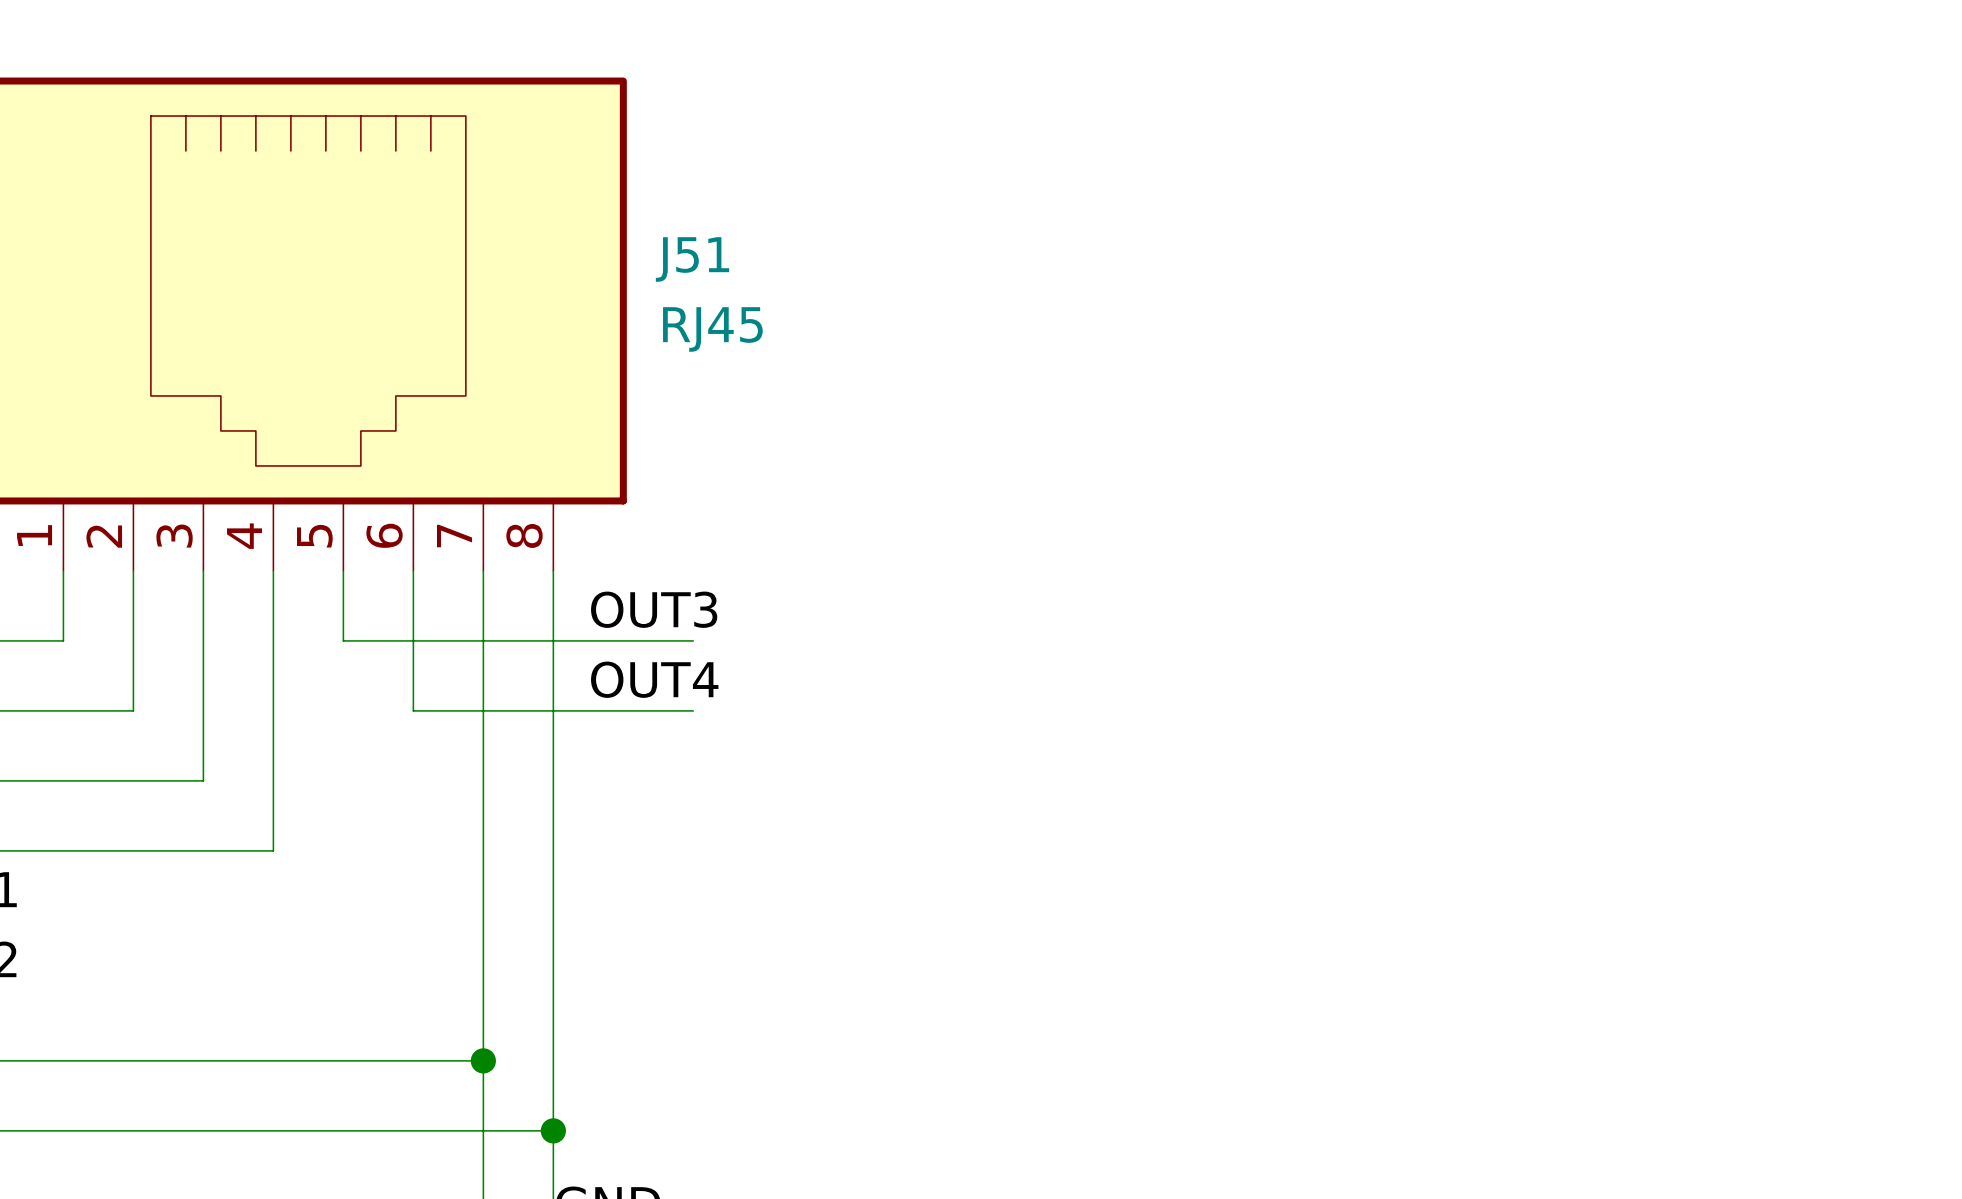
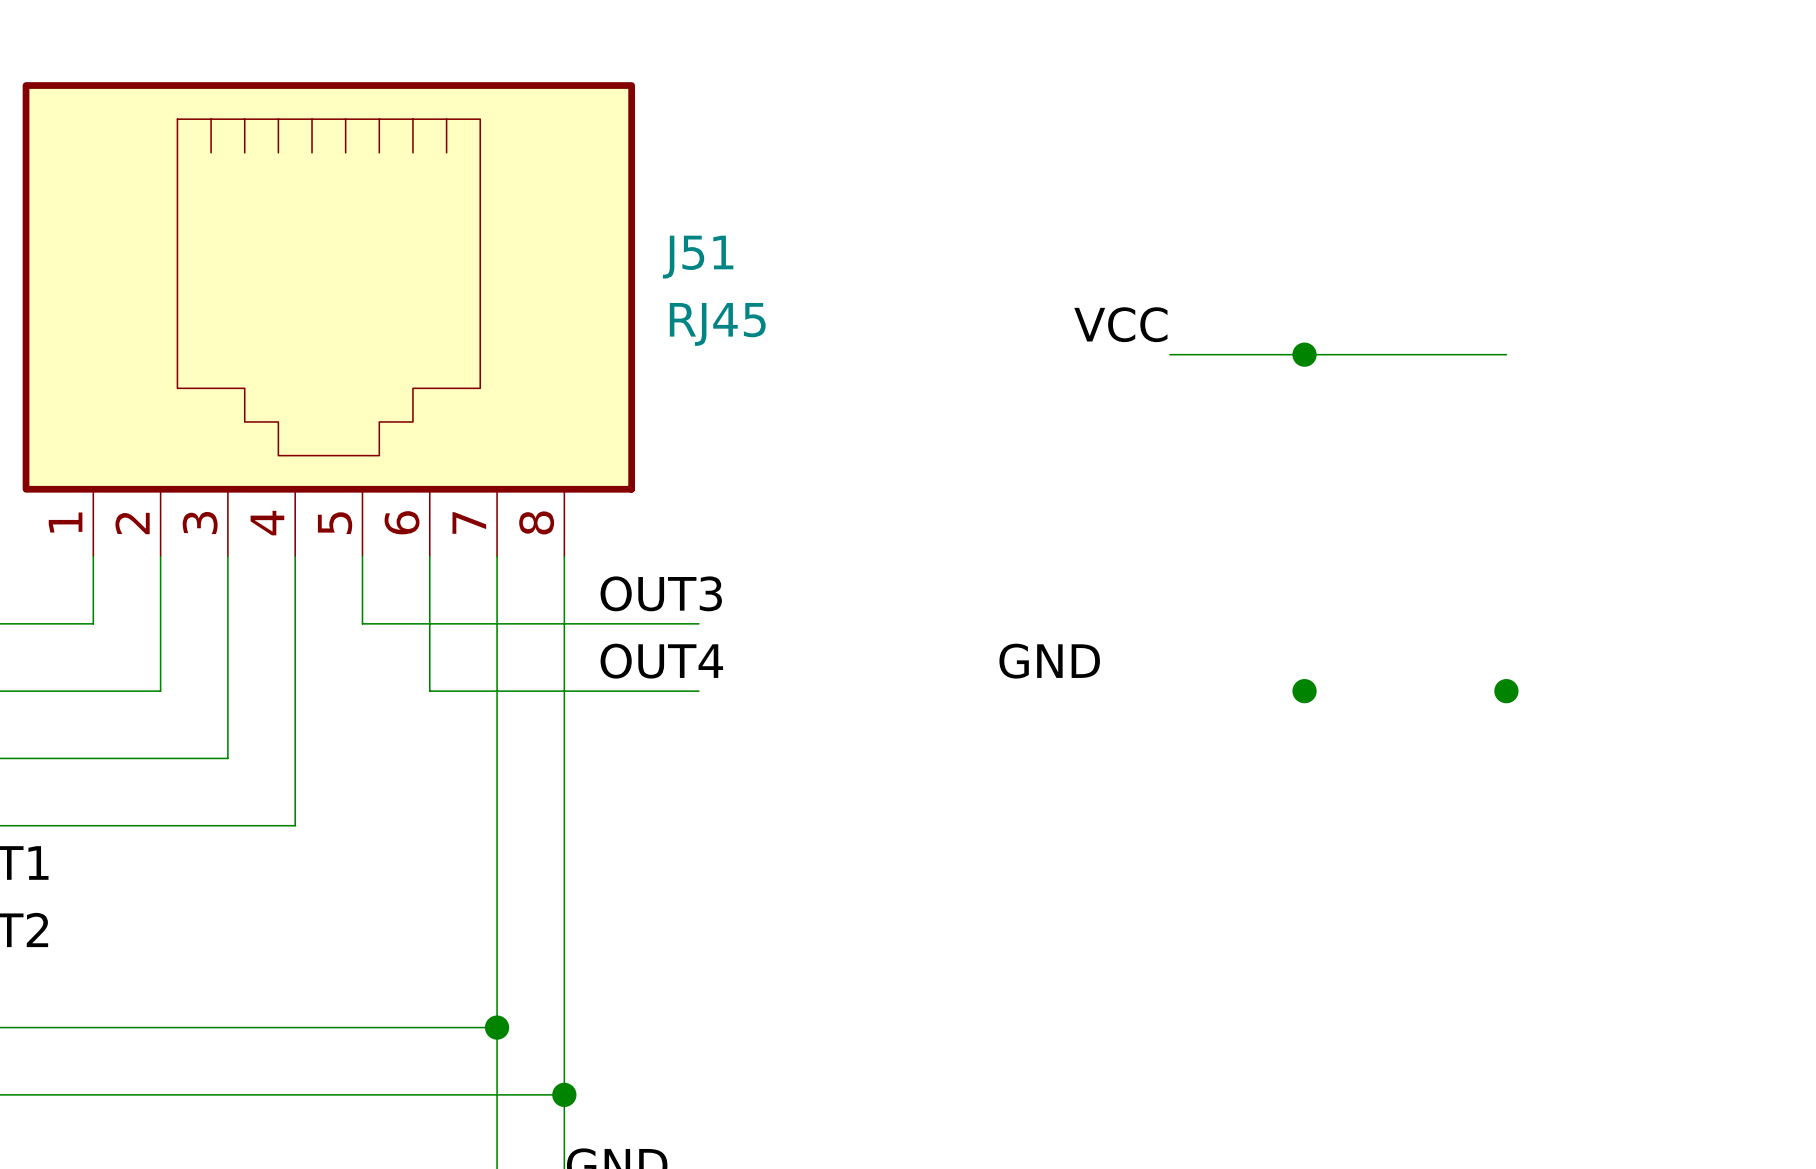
label: none -> VCC (1120, 324)
wire: none -> (1169, 354) (1506, 354)
junction: none -> (1304, 354)
label: none -> GND (1049, 661)
junction: none -> (1304, 691)
junction: none -> (1506, 691)

